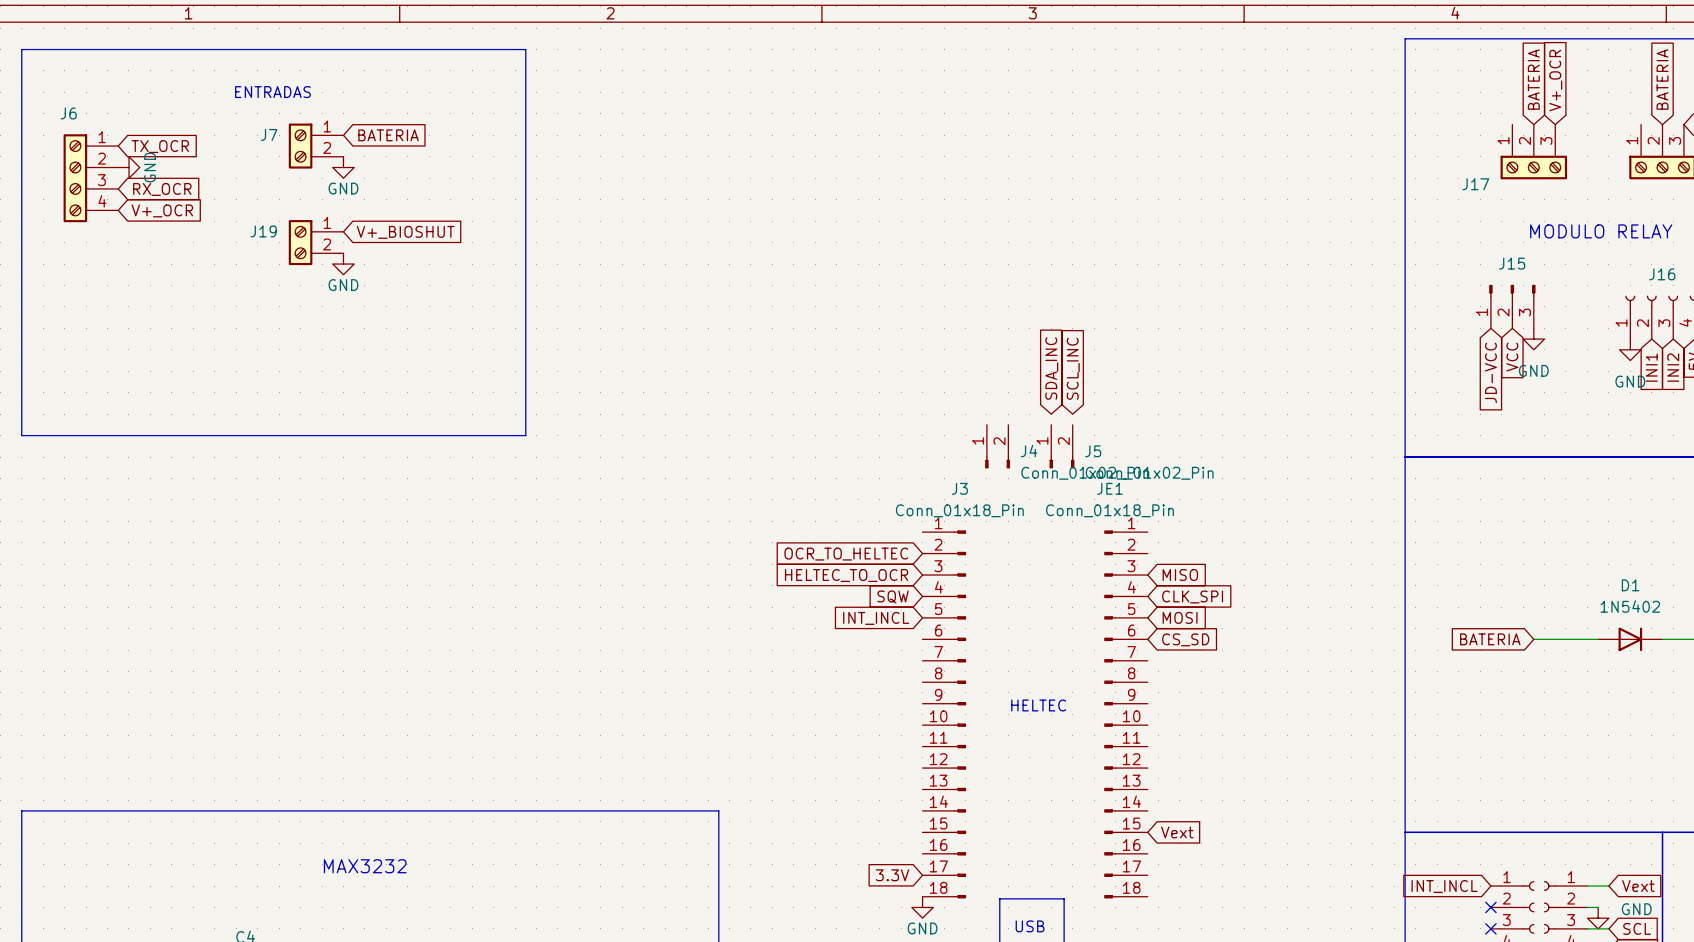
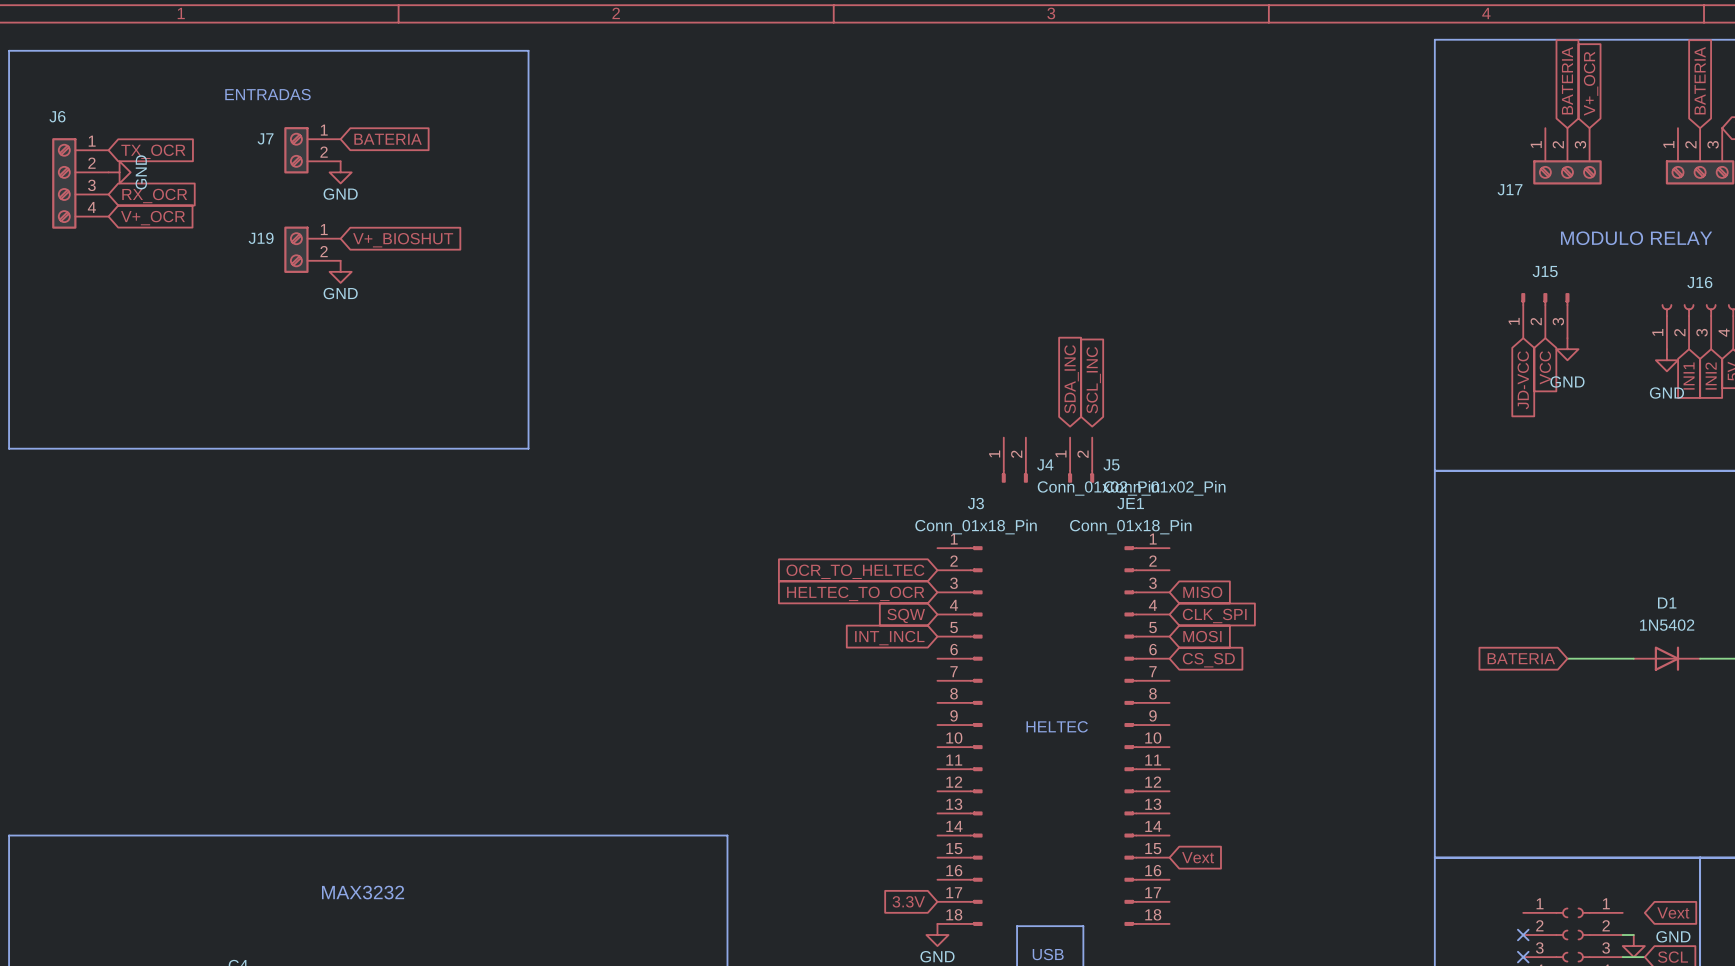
global label: INT_INCL (1444, 886) -> none
wire: (1587, 886) (1608, 886) -> none

